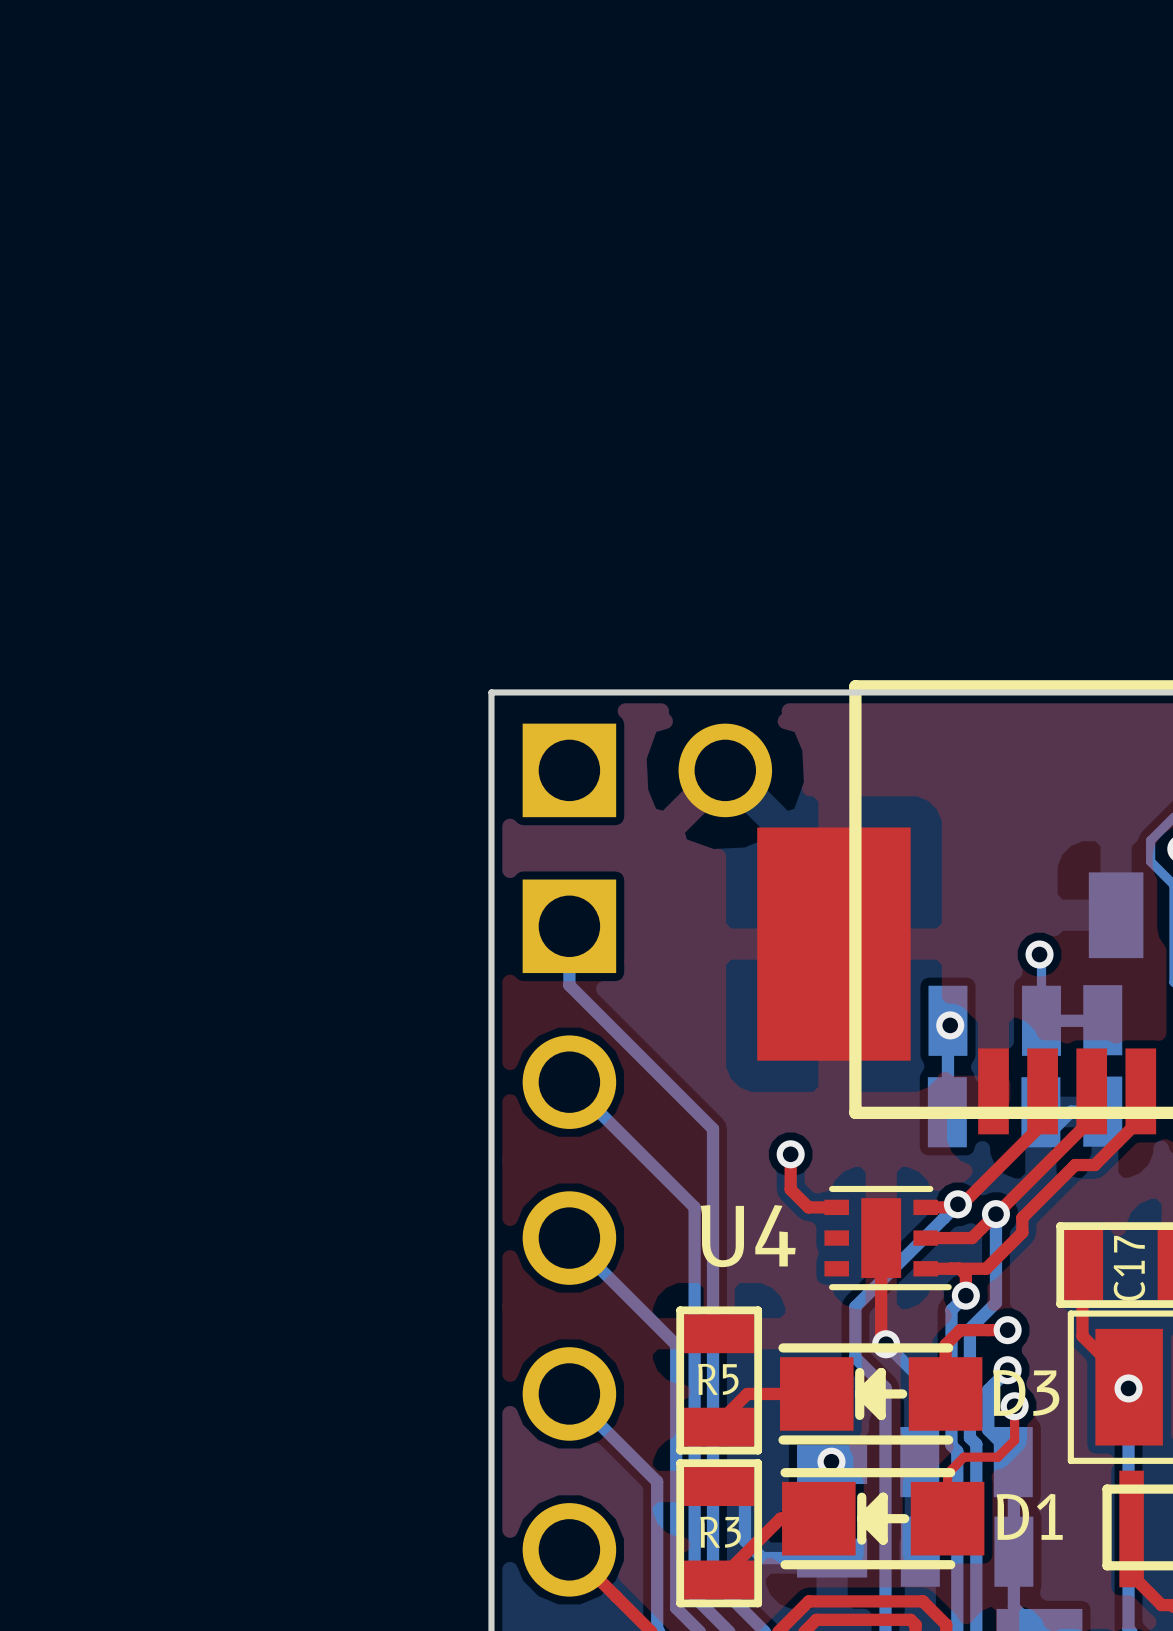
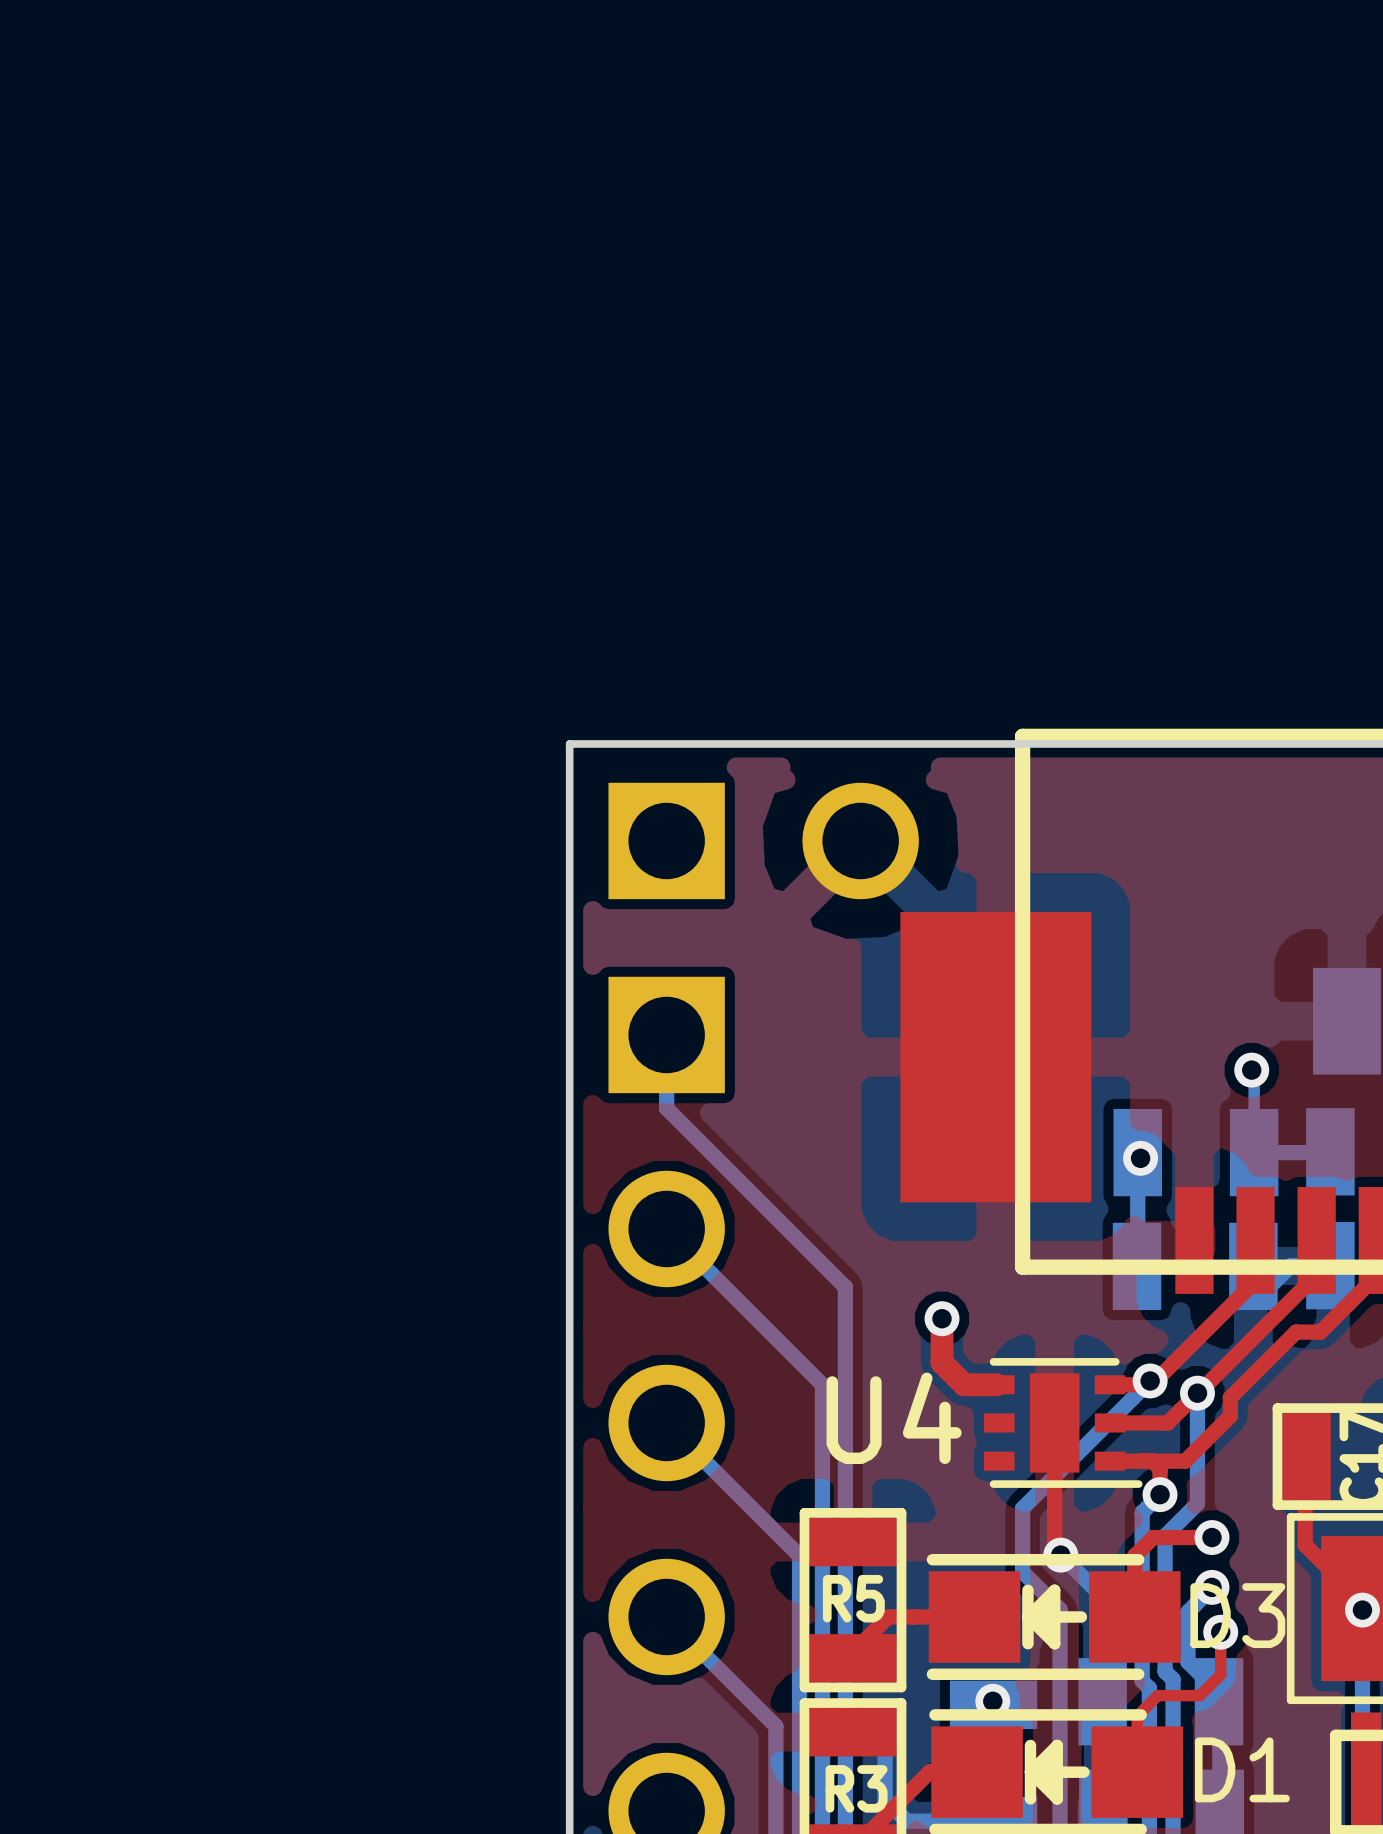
top track width: thin (790, 1154) (790, 1189) (808, 1207) (834, 1207) -> thick (942, 1318) (942, 1362) (964, 1384) (996, 1384)

